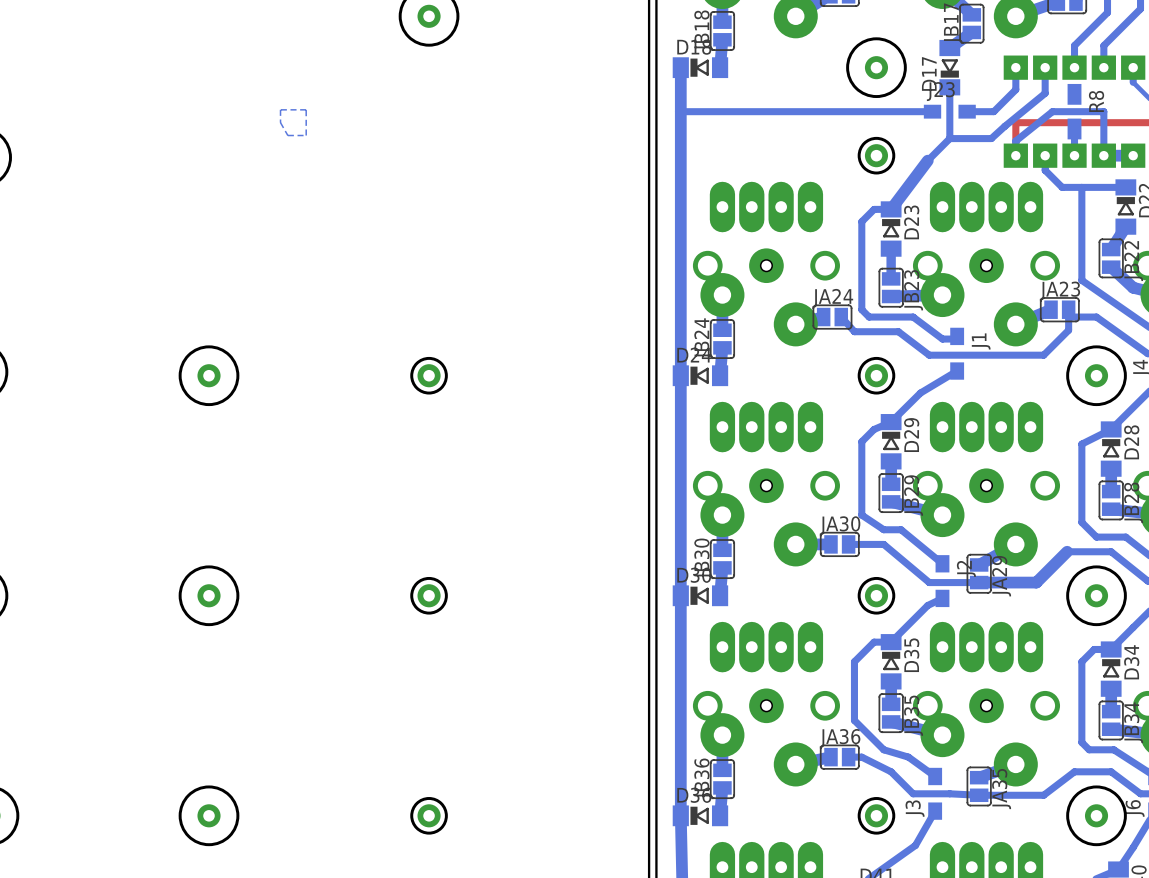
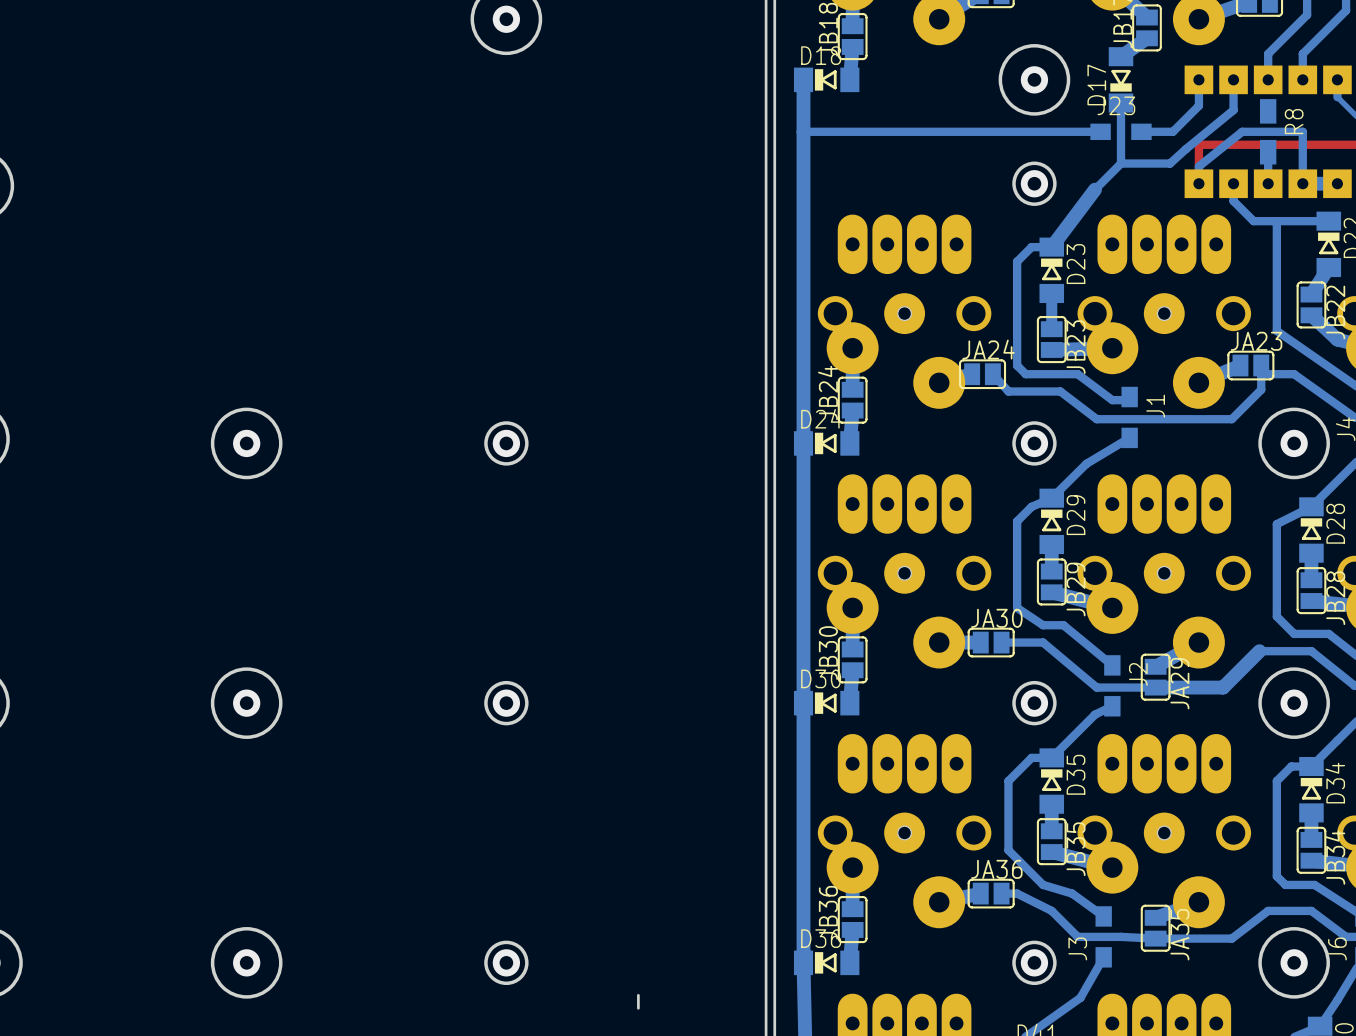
bottom zone outline: (306, 109) (306, 135) (287, 135) (280, 122) (280, 109) (306, 109) -> none
board edge: none -> (638, 995) (638, 1008)

